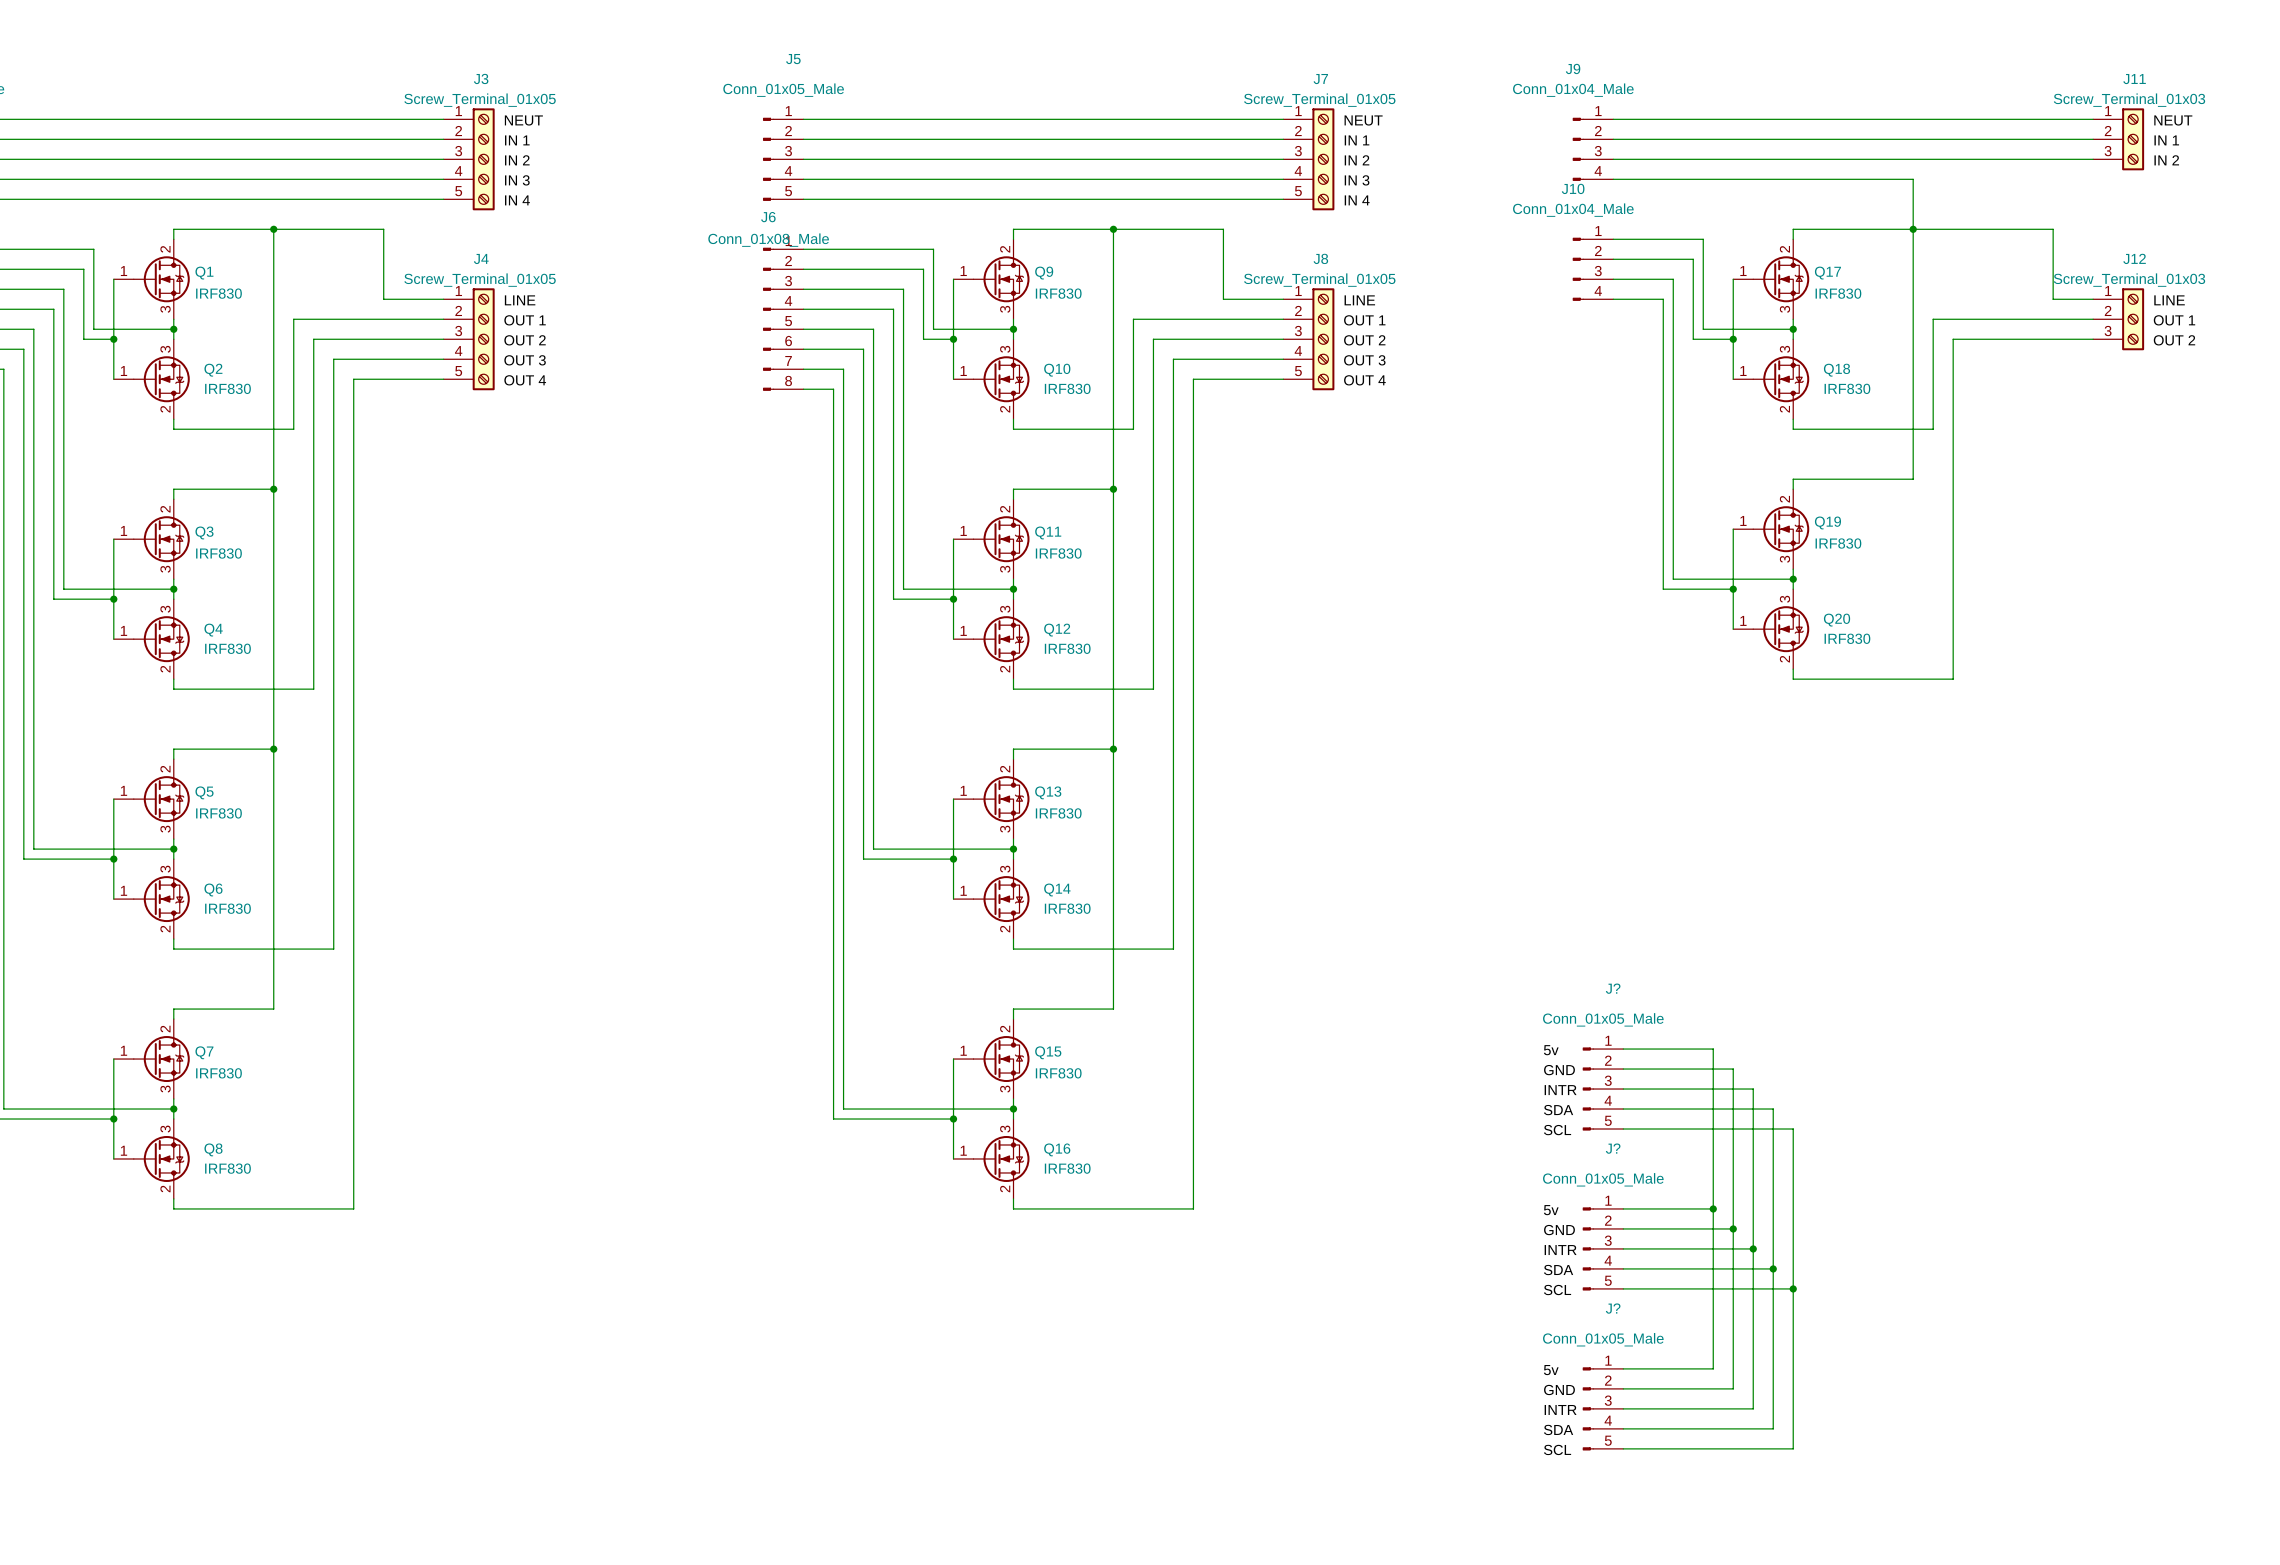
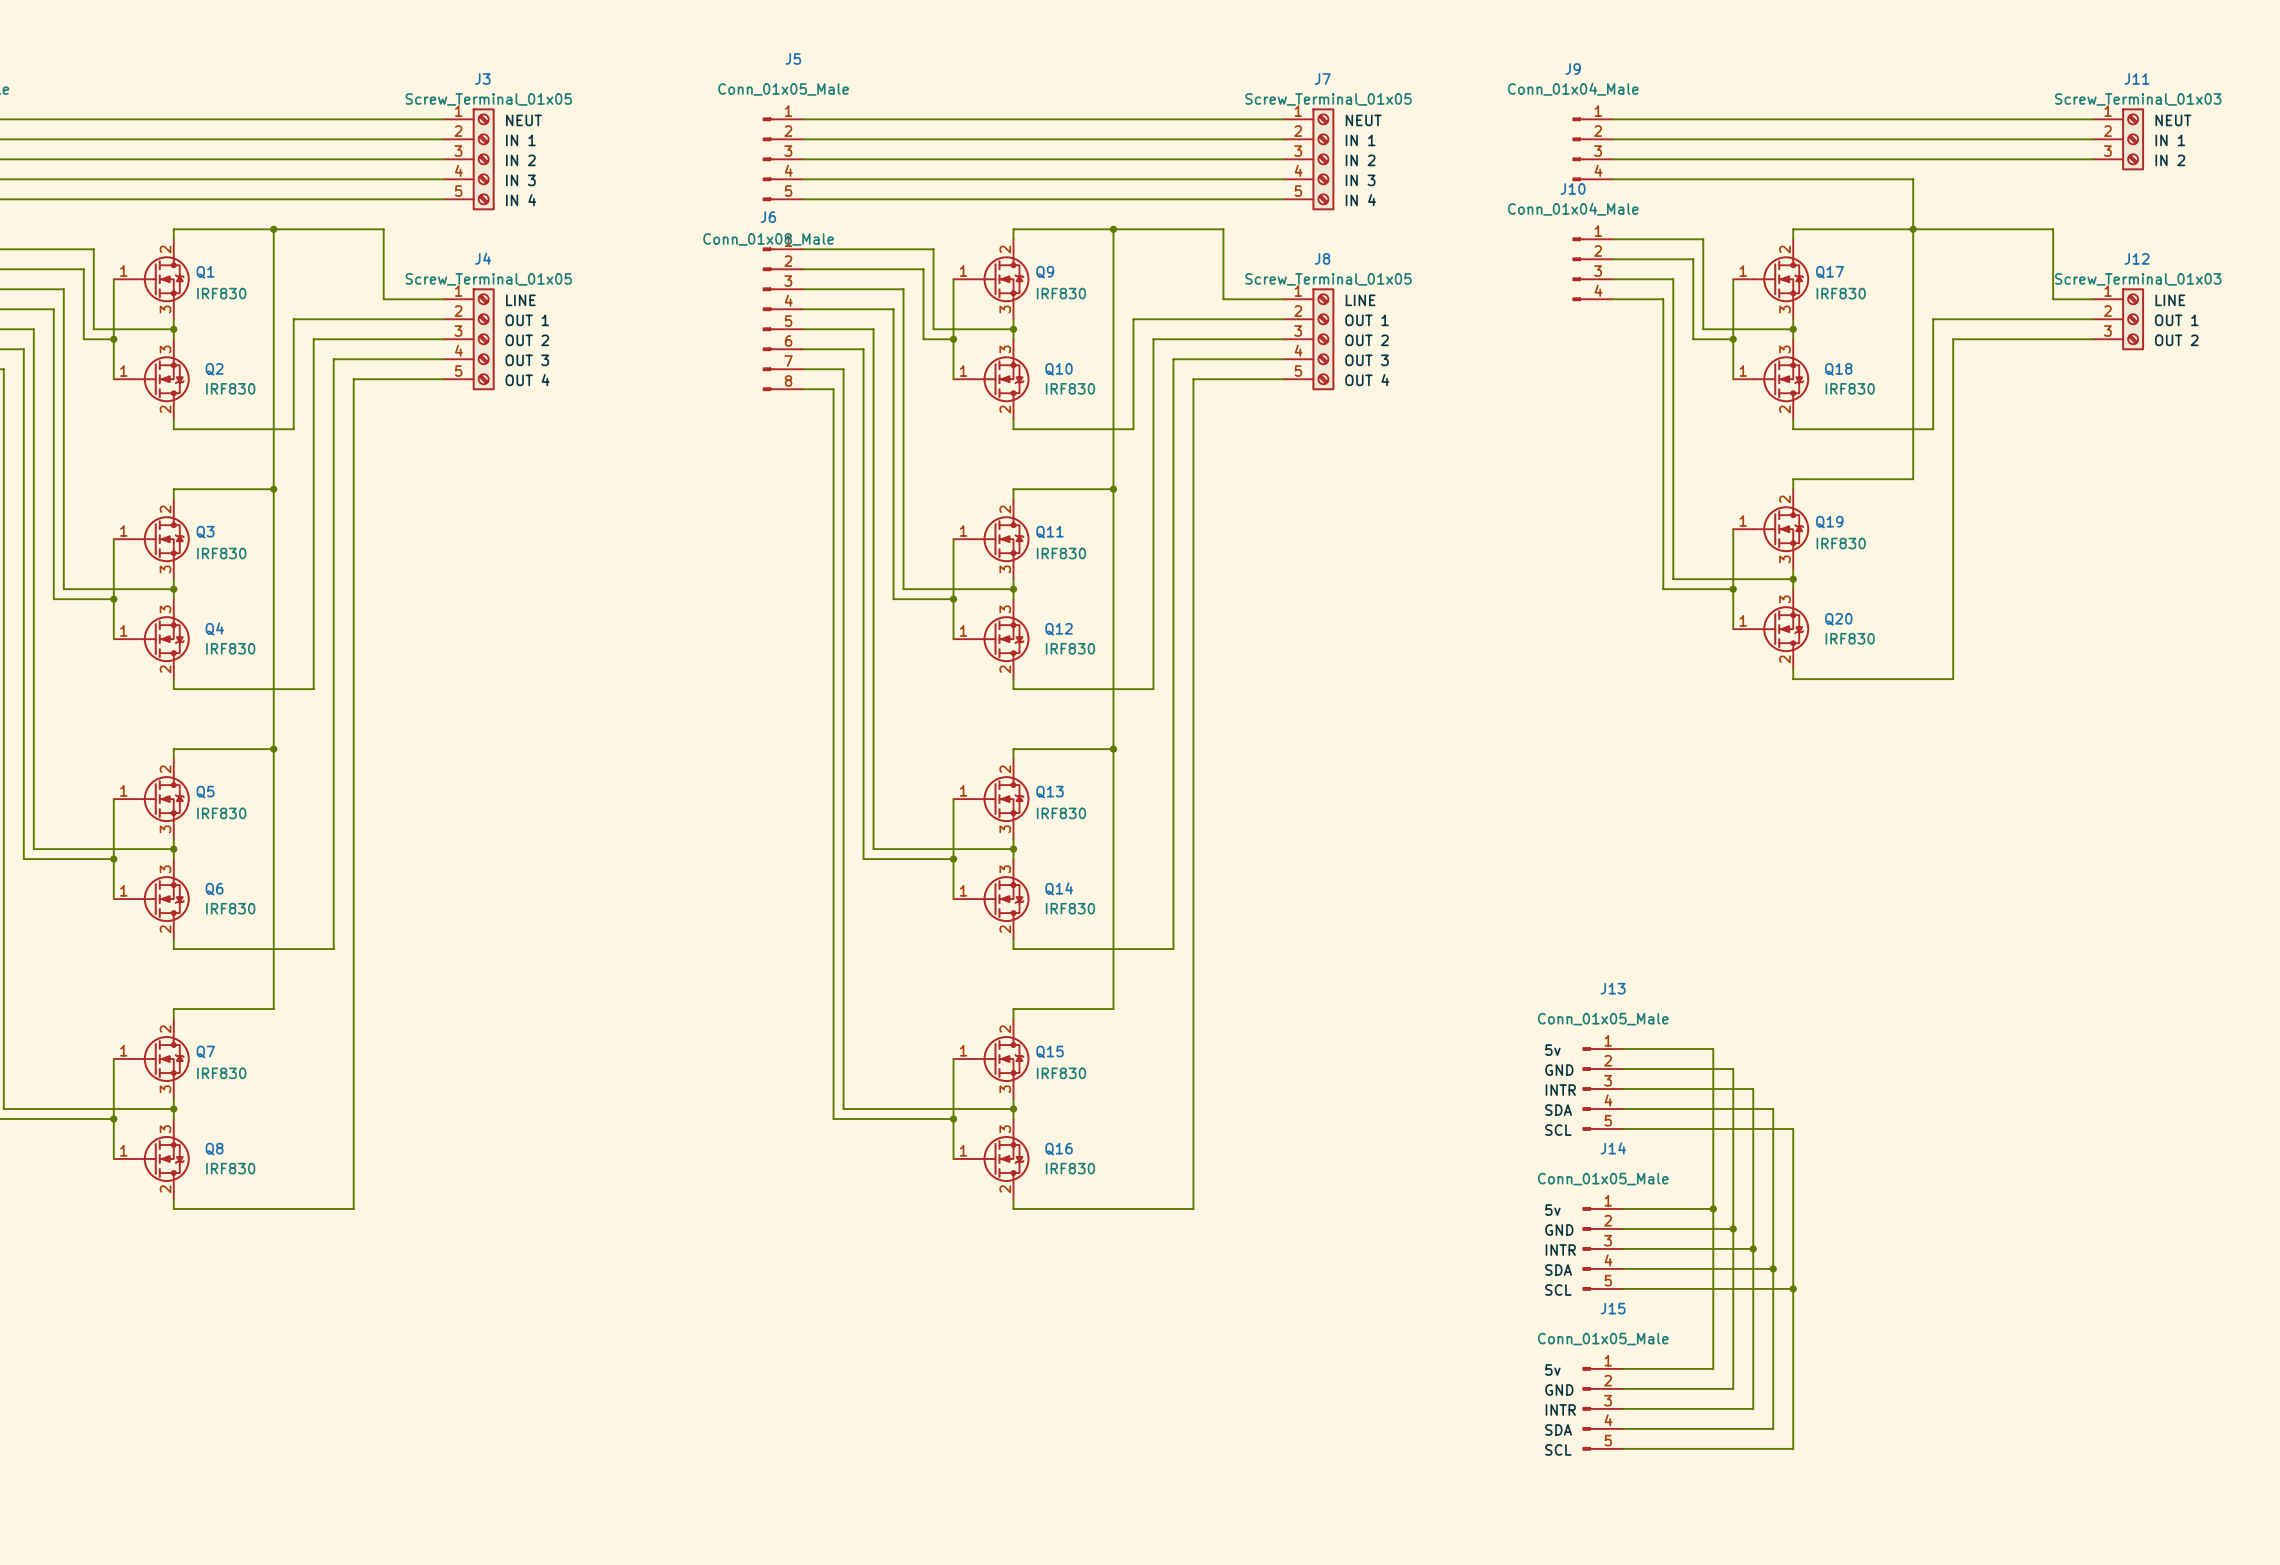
J? name: J? (1613, 988) -> J13 (1613, 988)
J? name: J? (1613, 1148) -> J14 (1613, 1148)
J? name: J? (1613, 1308) -> J15 (1613, 1308)

